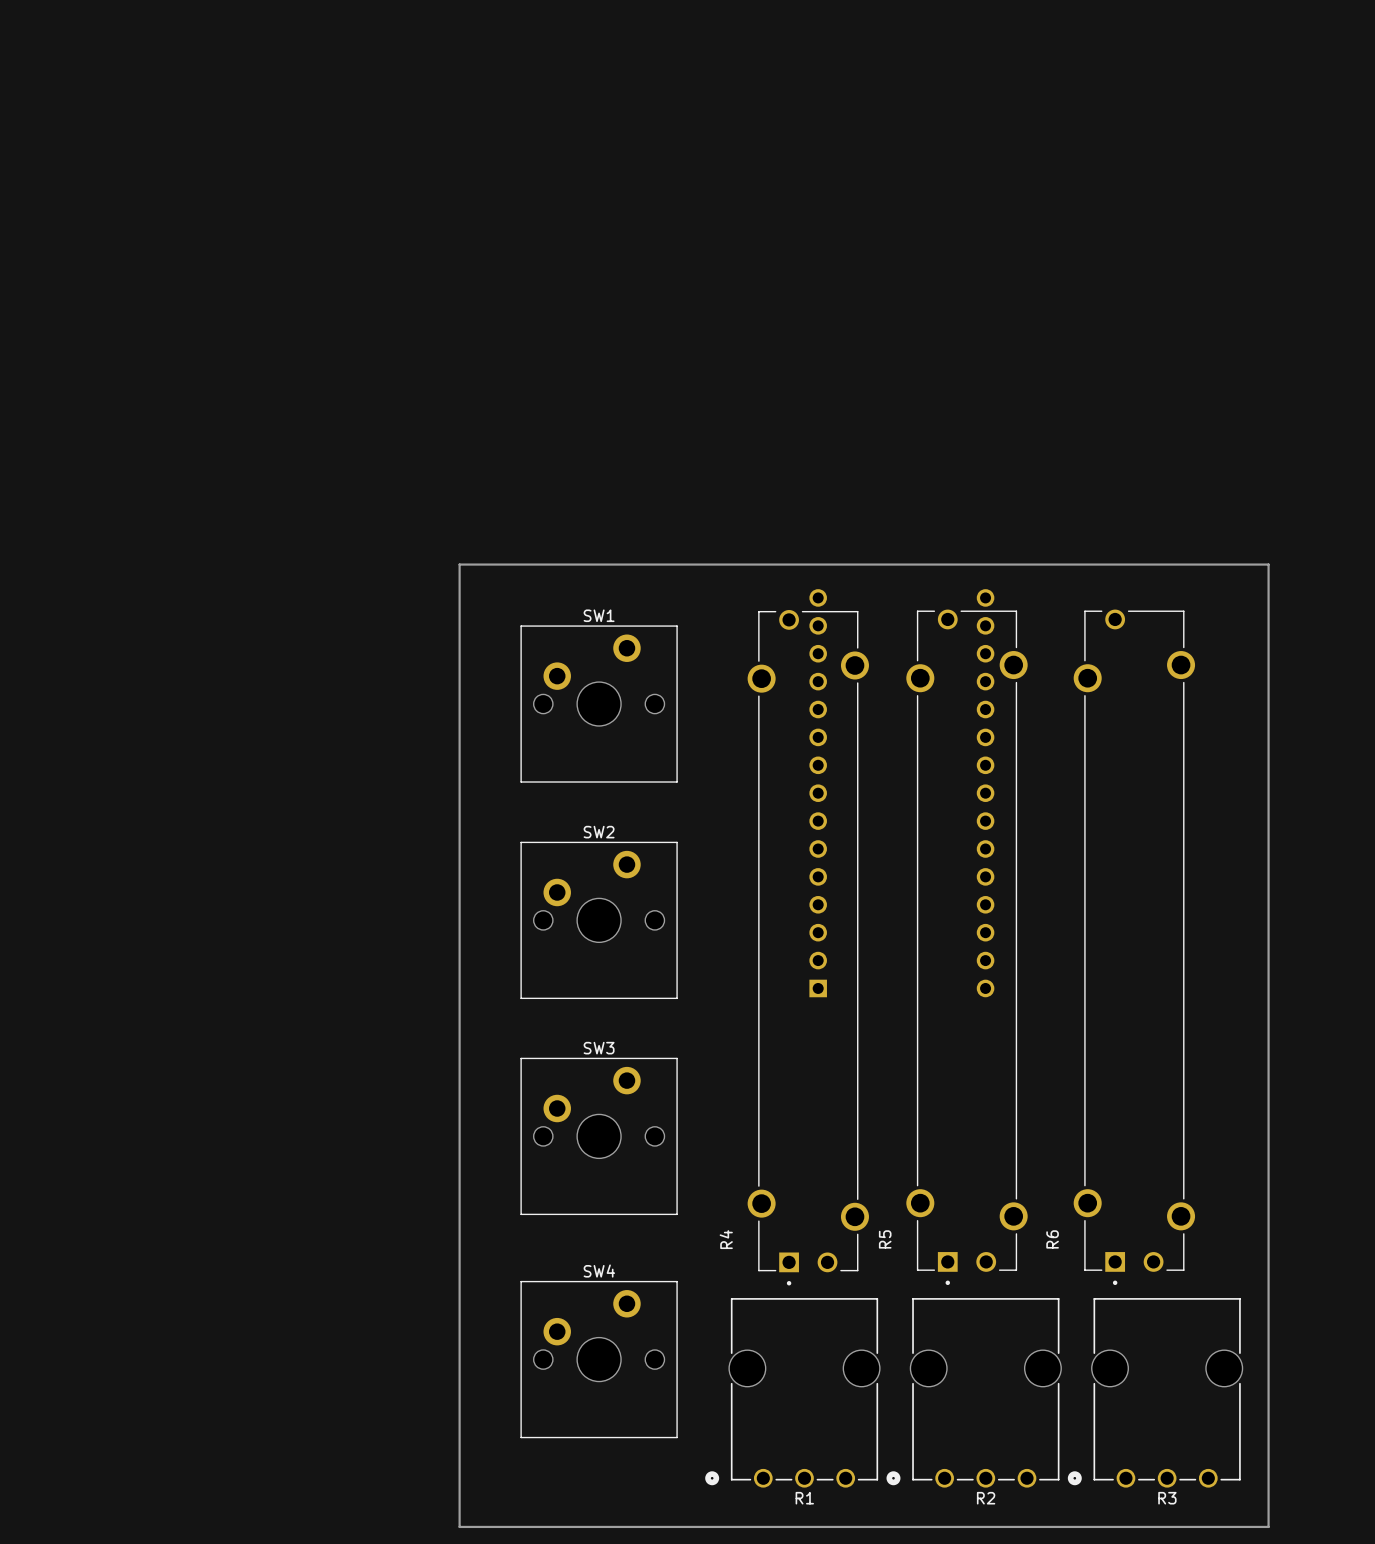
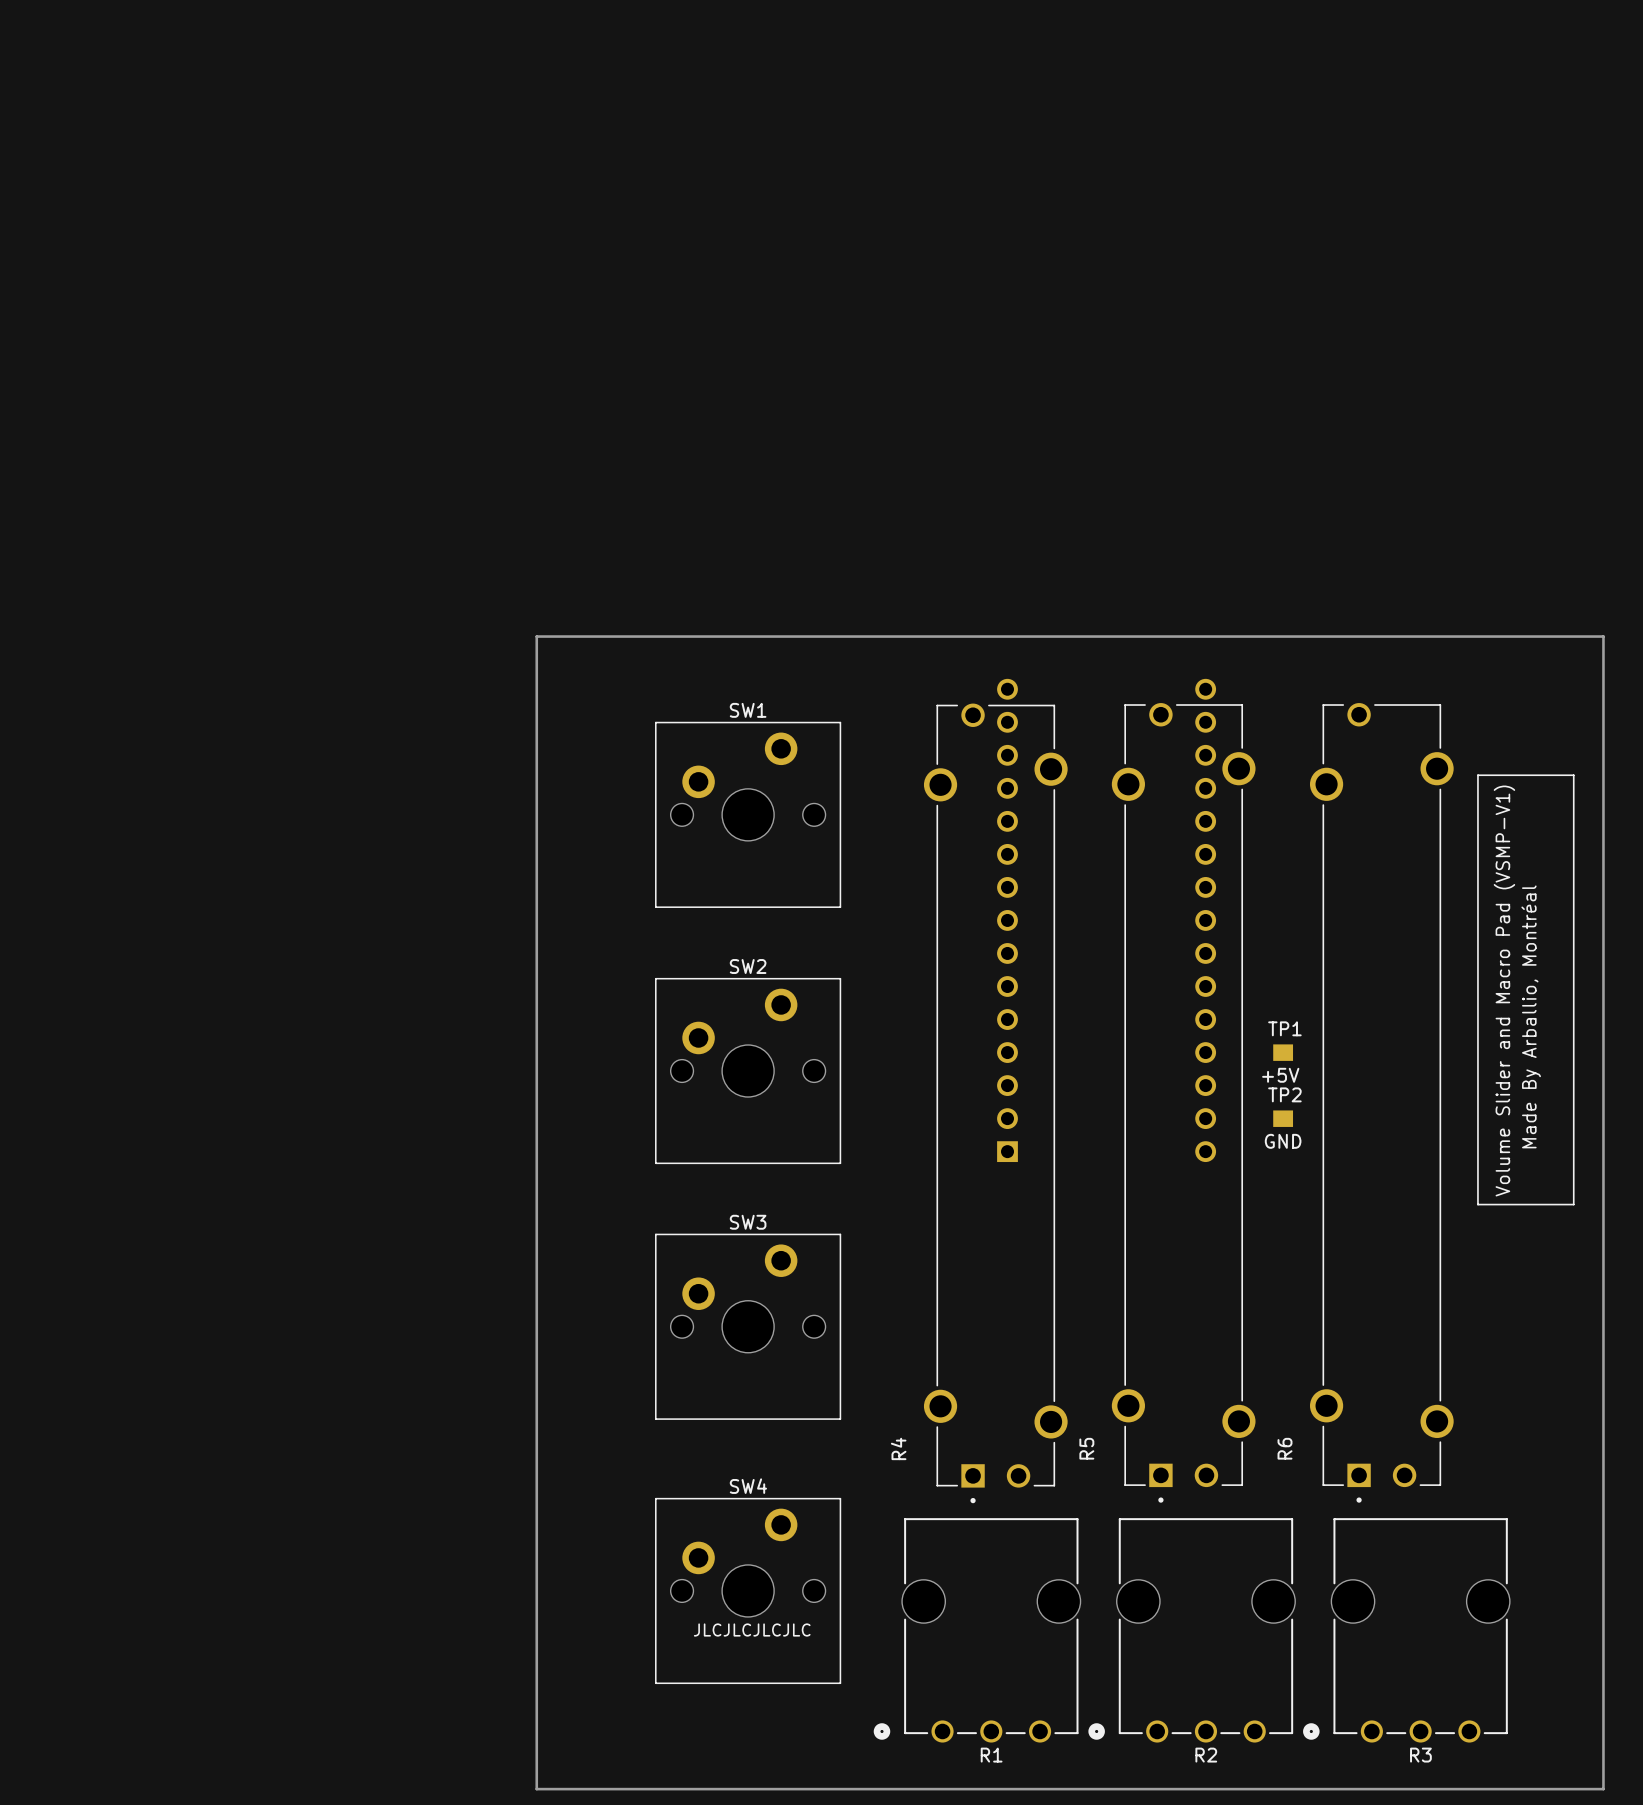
line: none -> (1477, 775) (1573, 775) (1573, 1204) (1477, 1204) (1477, 775)
text: none -> Volume Slider and Macro Pad (VSMP-V1) (1504, 991)
text: none -> Made By Arballio, Montréal (1531, 1016)
TP1: none -> +5V (1283, 1052)
TP2: none -> GND (1283, 1118)
text: none -> JLCJLCJLCJLC (752, 1630)
board edge: (459, 1526) (459, 564) (1268, 564) (1268, 1526) -> (582, 1789) (536, 1789) (536, 636) (1603, 636) (1603, 1789) (1540, 1789)

